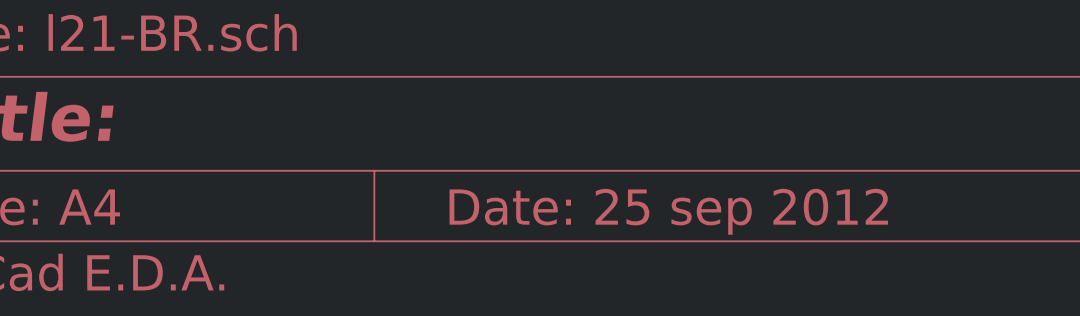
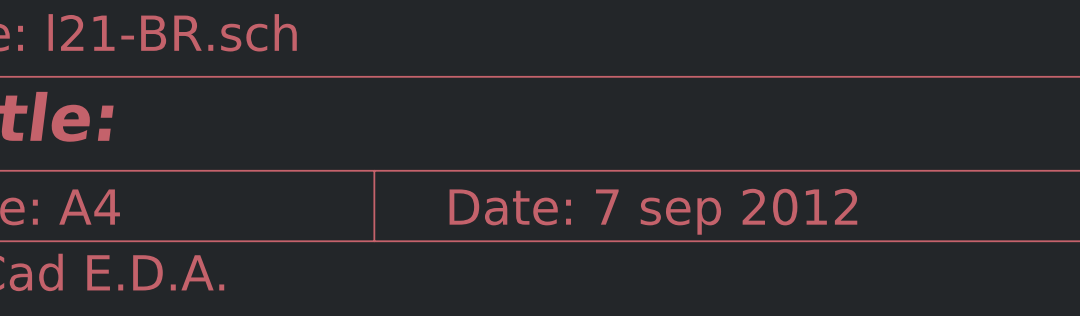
title block: Date: 25 sep 2012 (668, 211) -> Date: 7 sep 2012 (653, 211)

